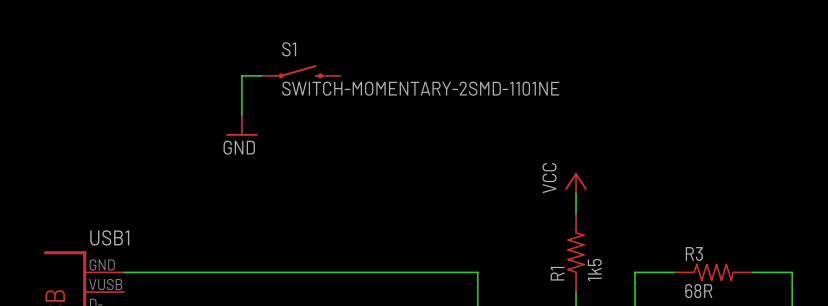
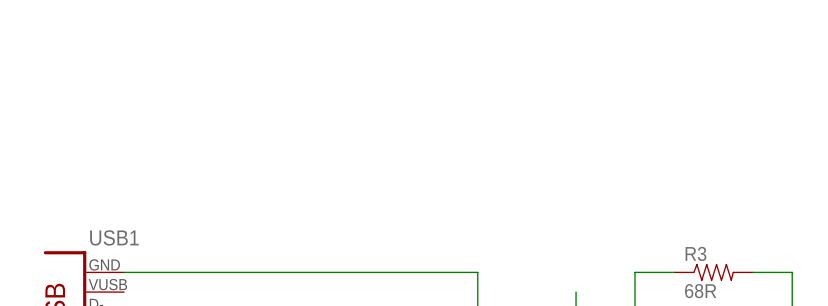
S1: SWITCH-MOMENTARY-2SMD-1101NE (300, 71) -> none
wire: (261, 75) (241, 75) (241, 115) -> none
power symbol: GND (241, 125) -> none
power symbol: VCC (576, 183) -> none
wire: (576, 193) (576, 213) -> none
R1: 1k5 (576, 252) -> none

